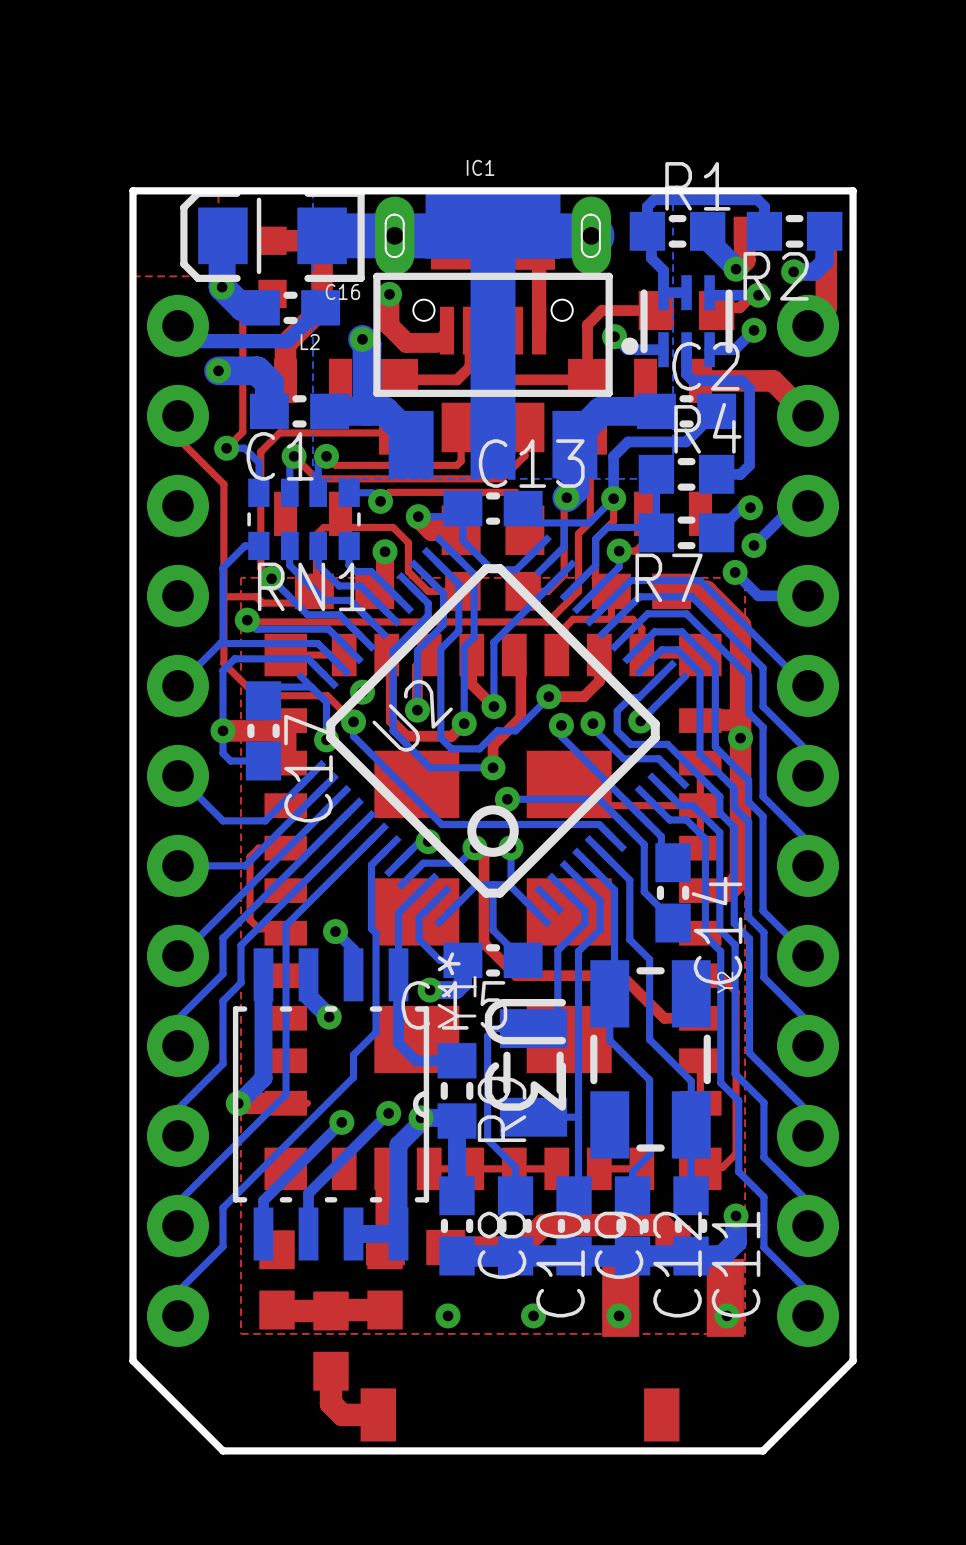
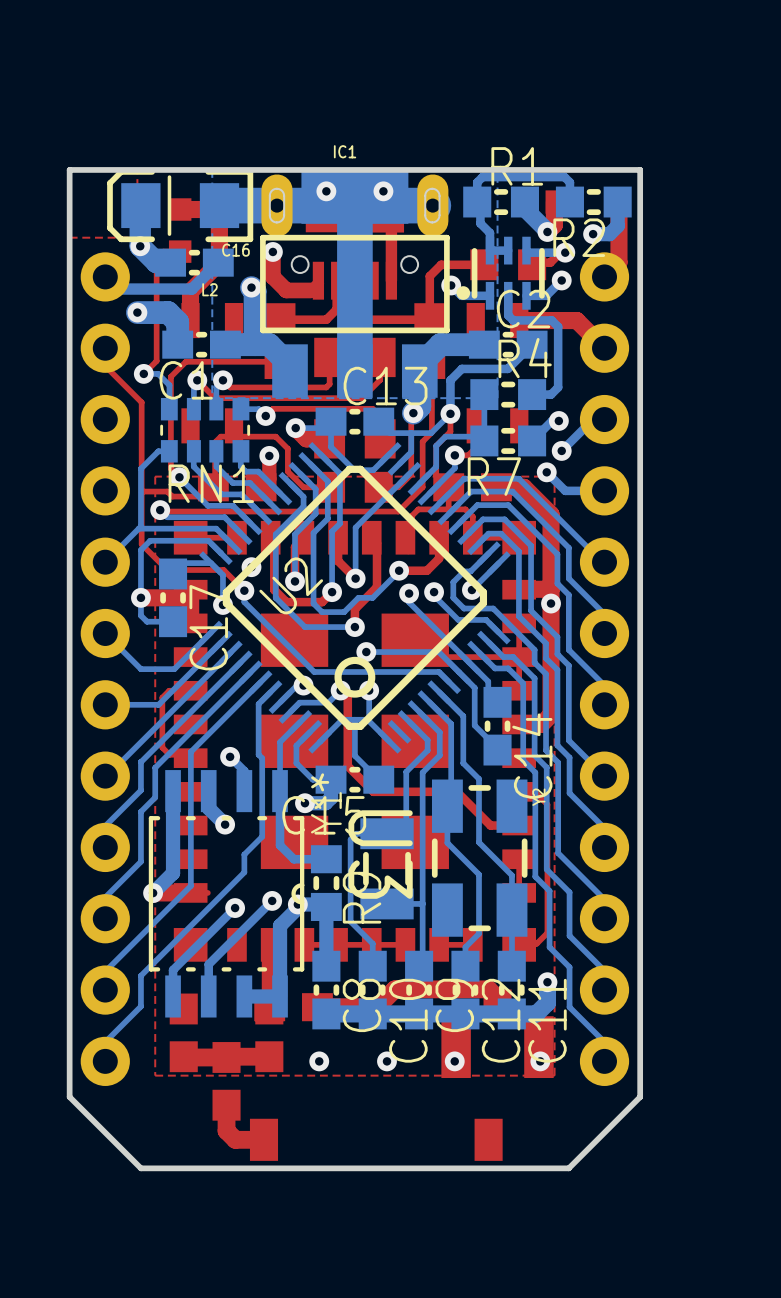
via: none -> (326, 191)
via: none -> (383, 191)

